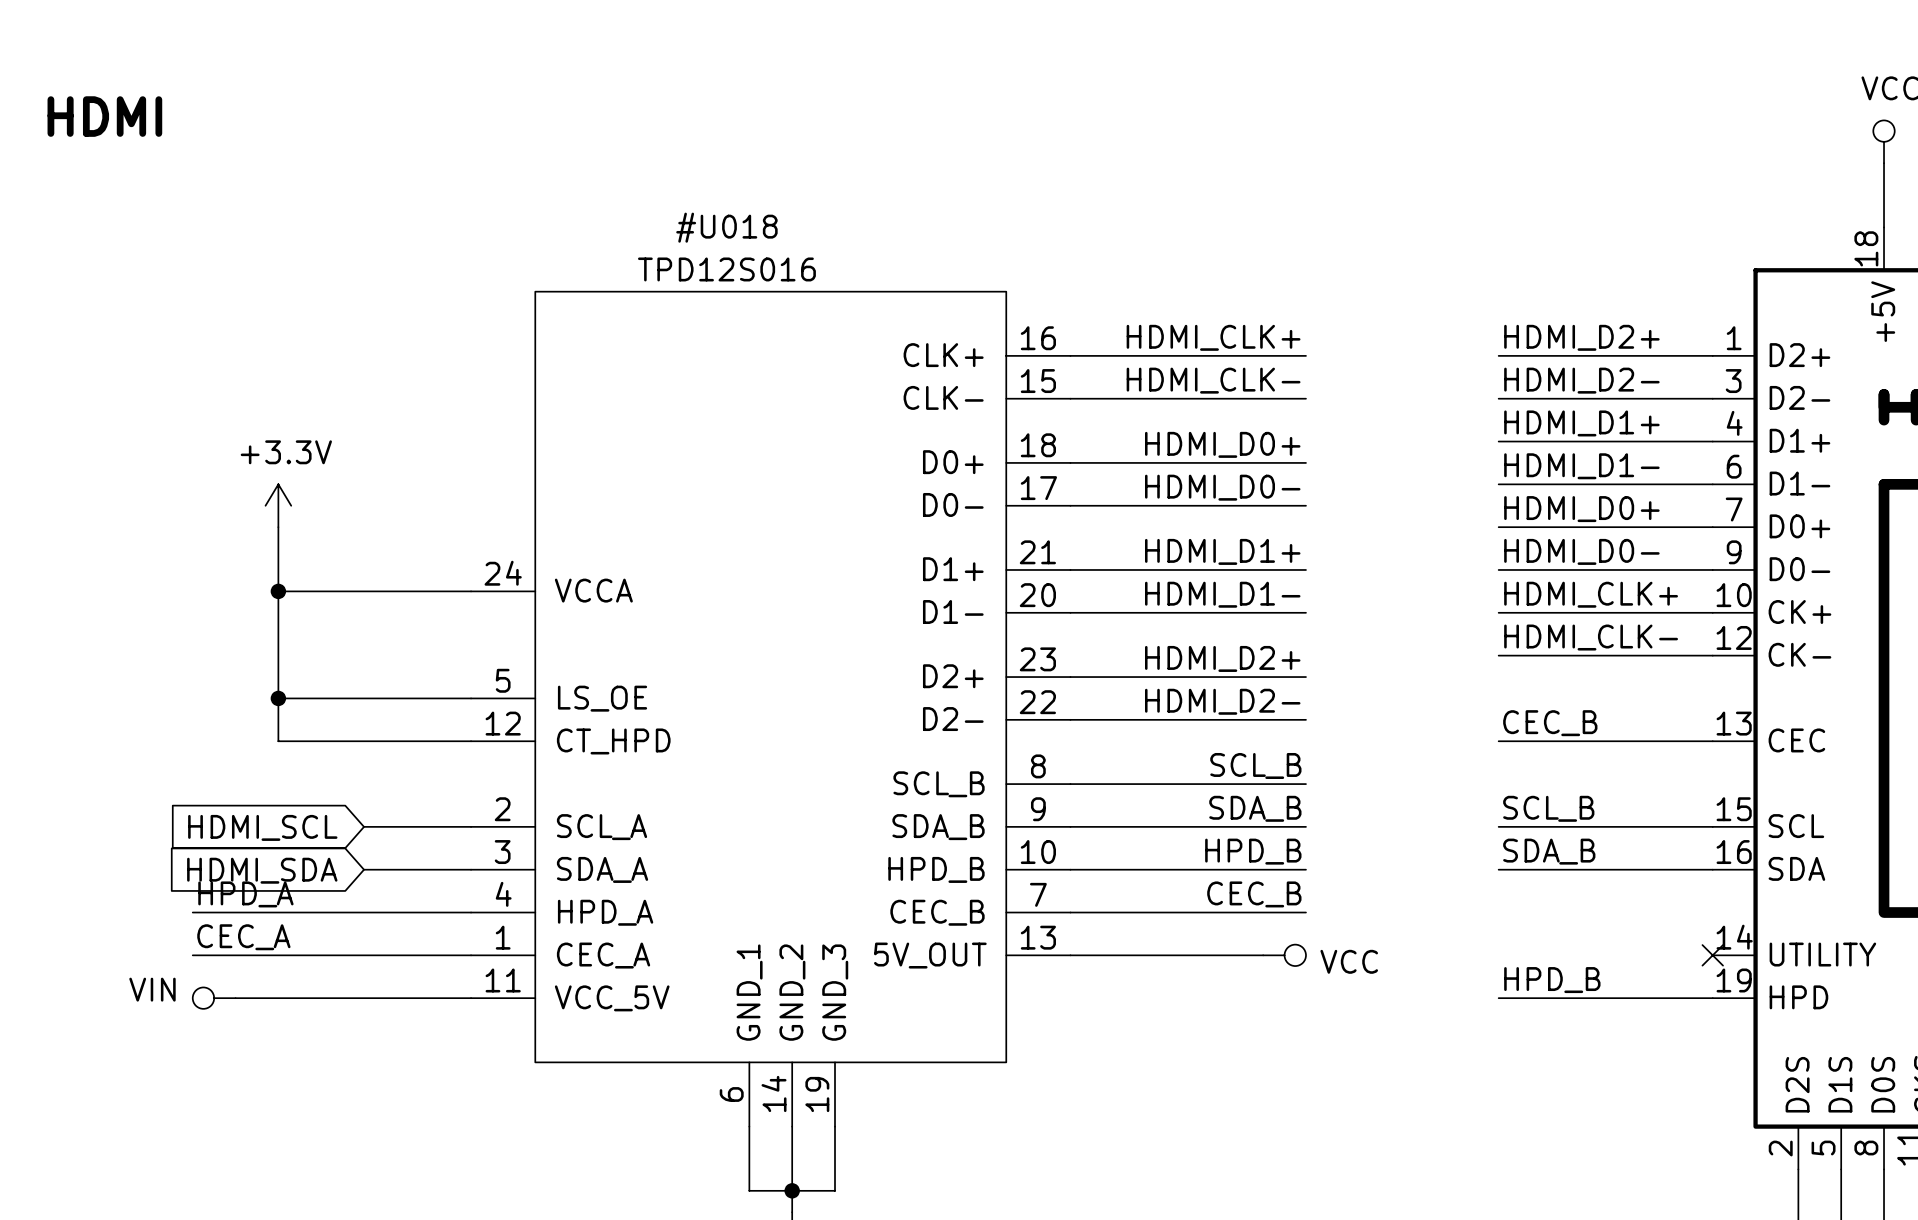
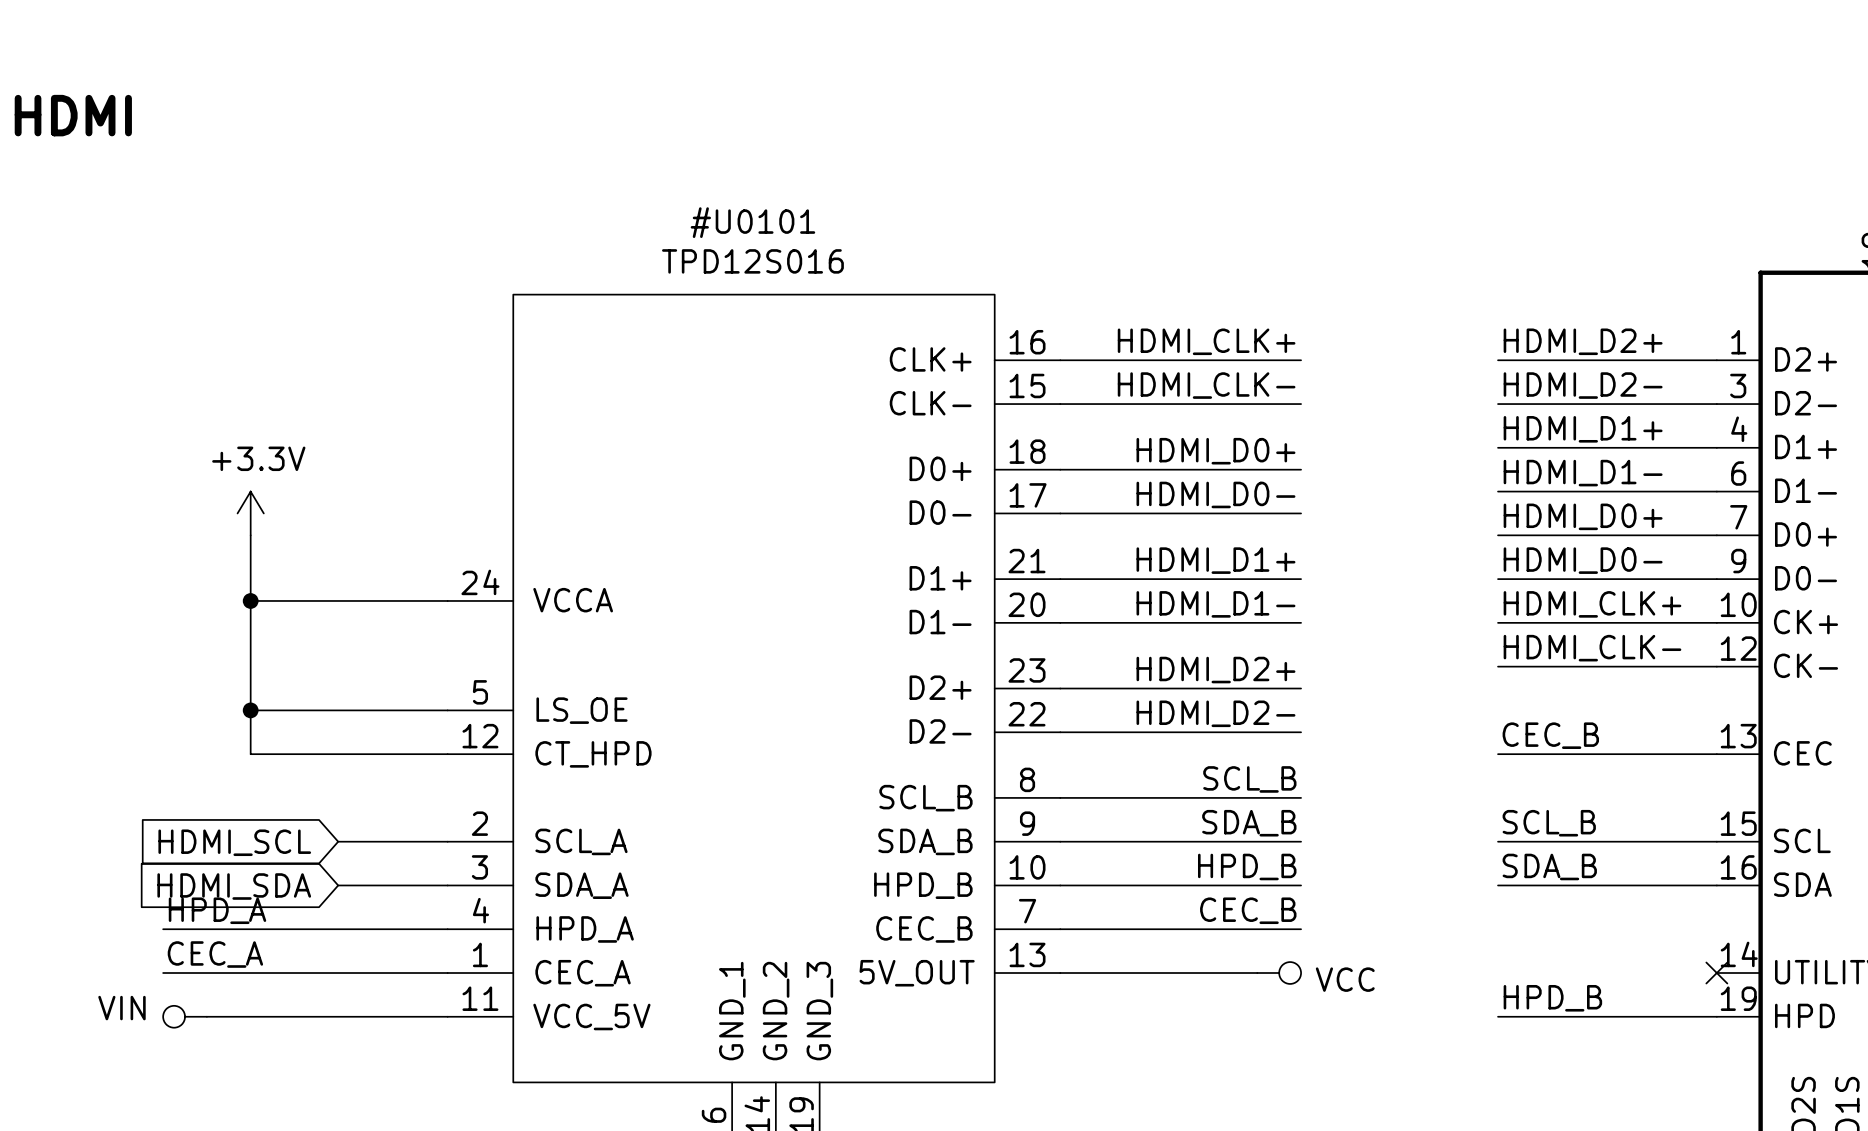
#U018 name: #U018 (726, 227) -> #U0101 (752, 222)
#U018 text position: TPD12S016 (726, 269) -> TPD12S016 (752, 261)

